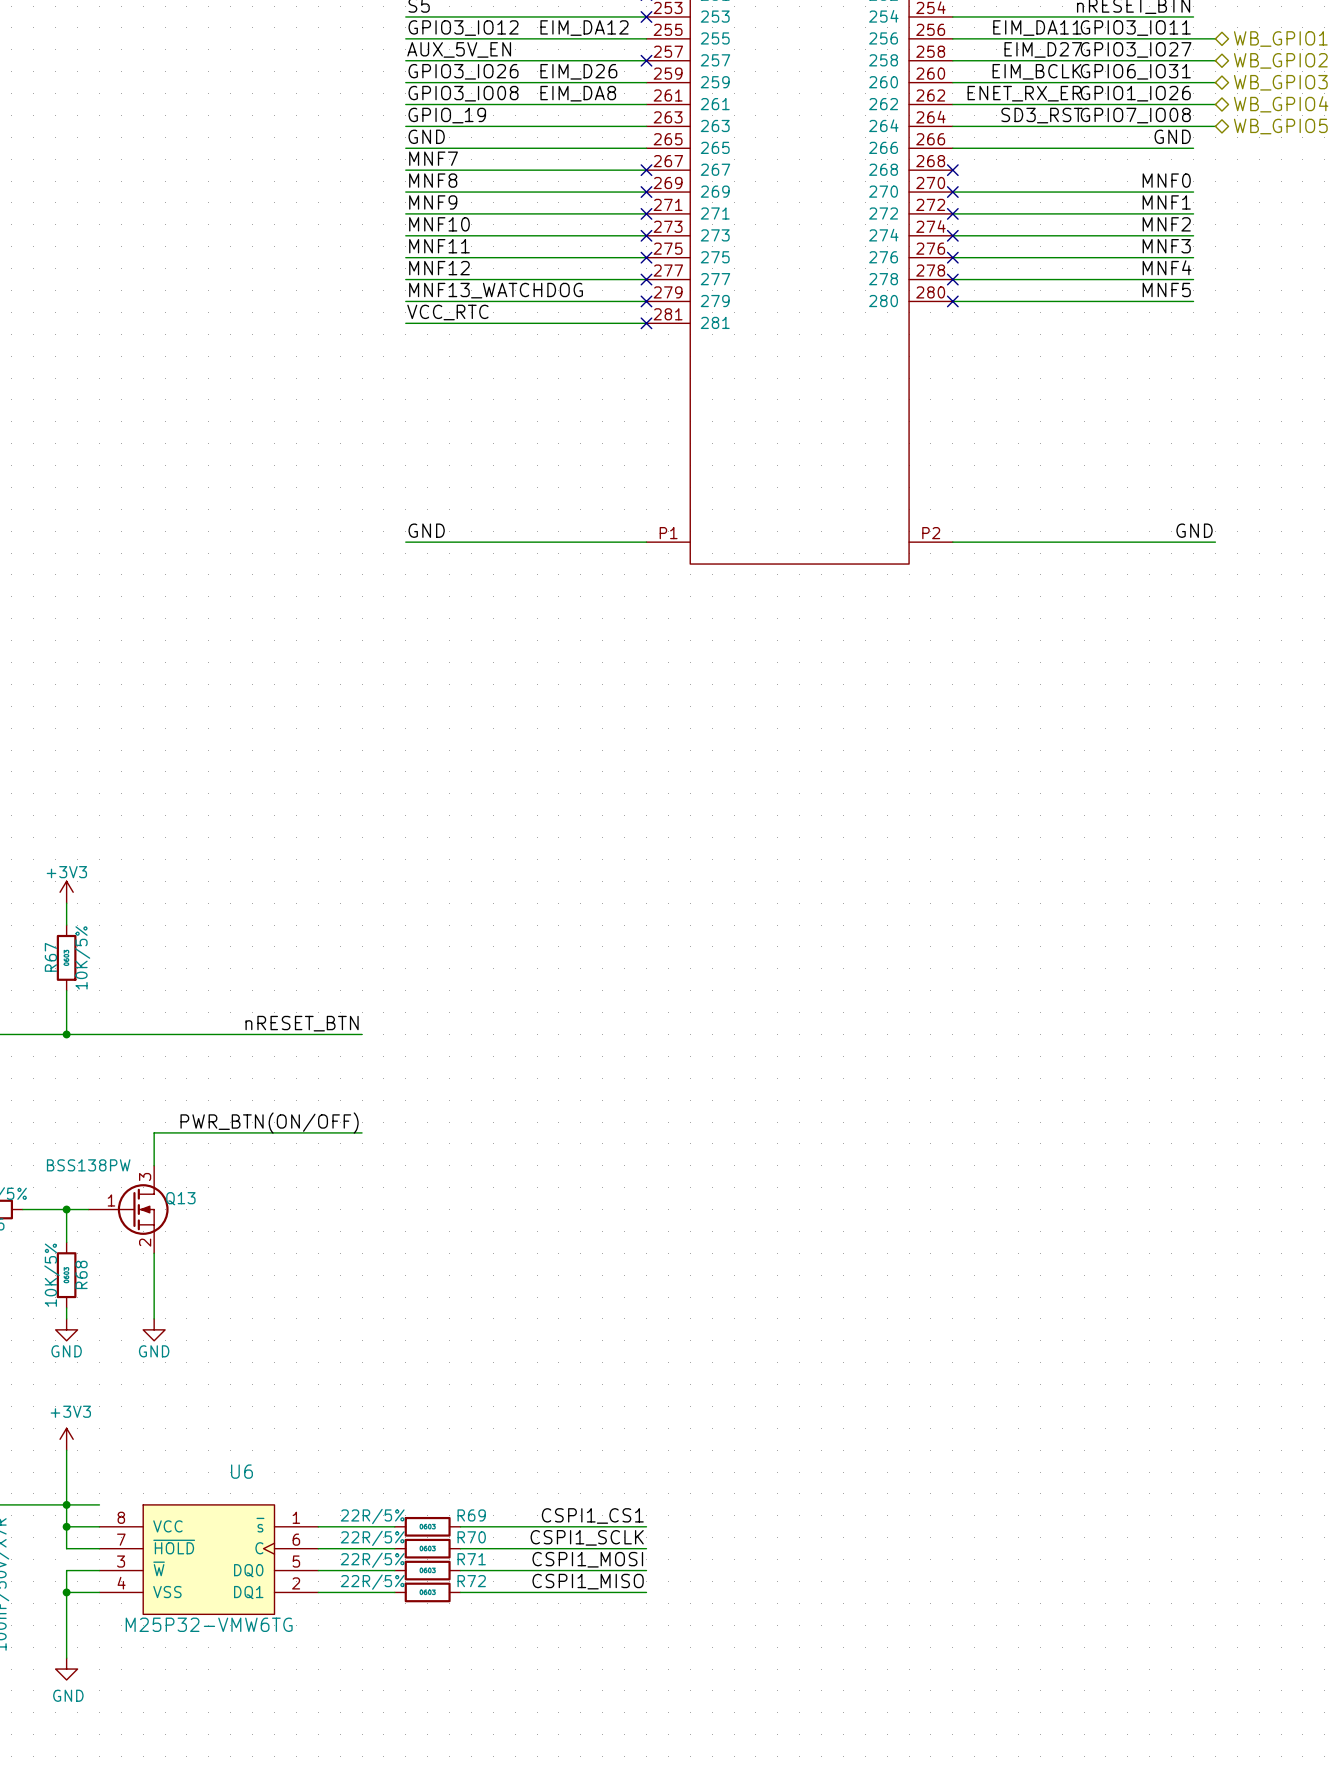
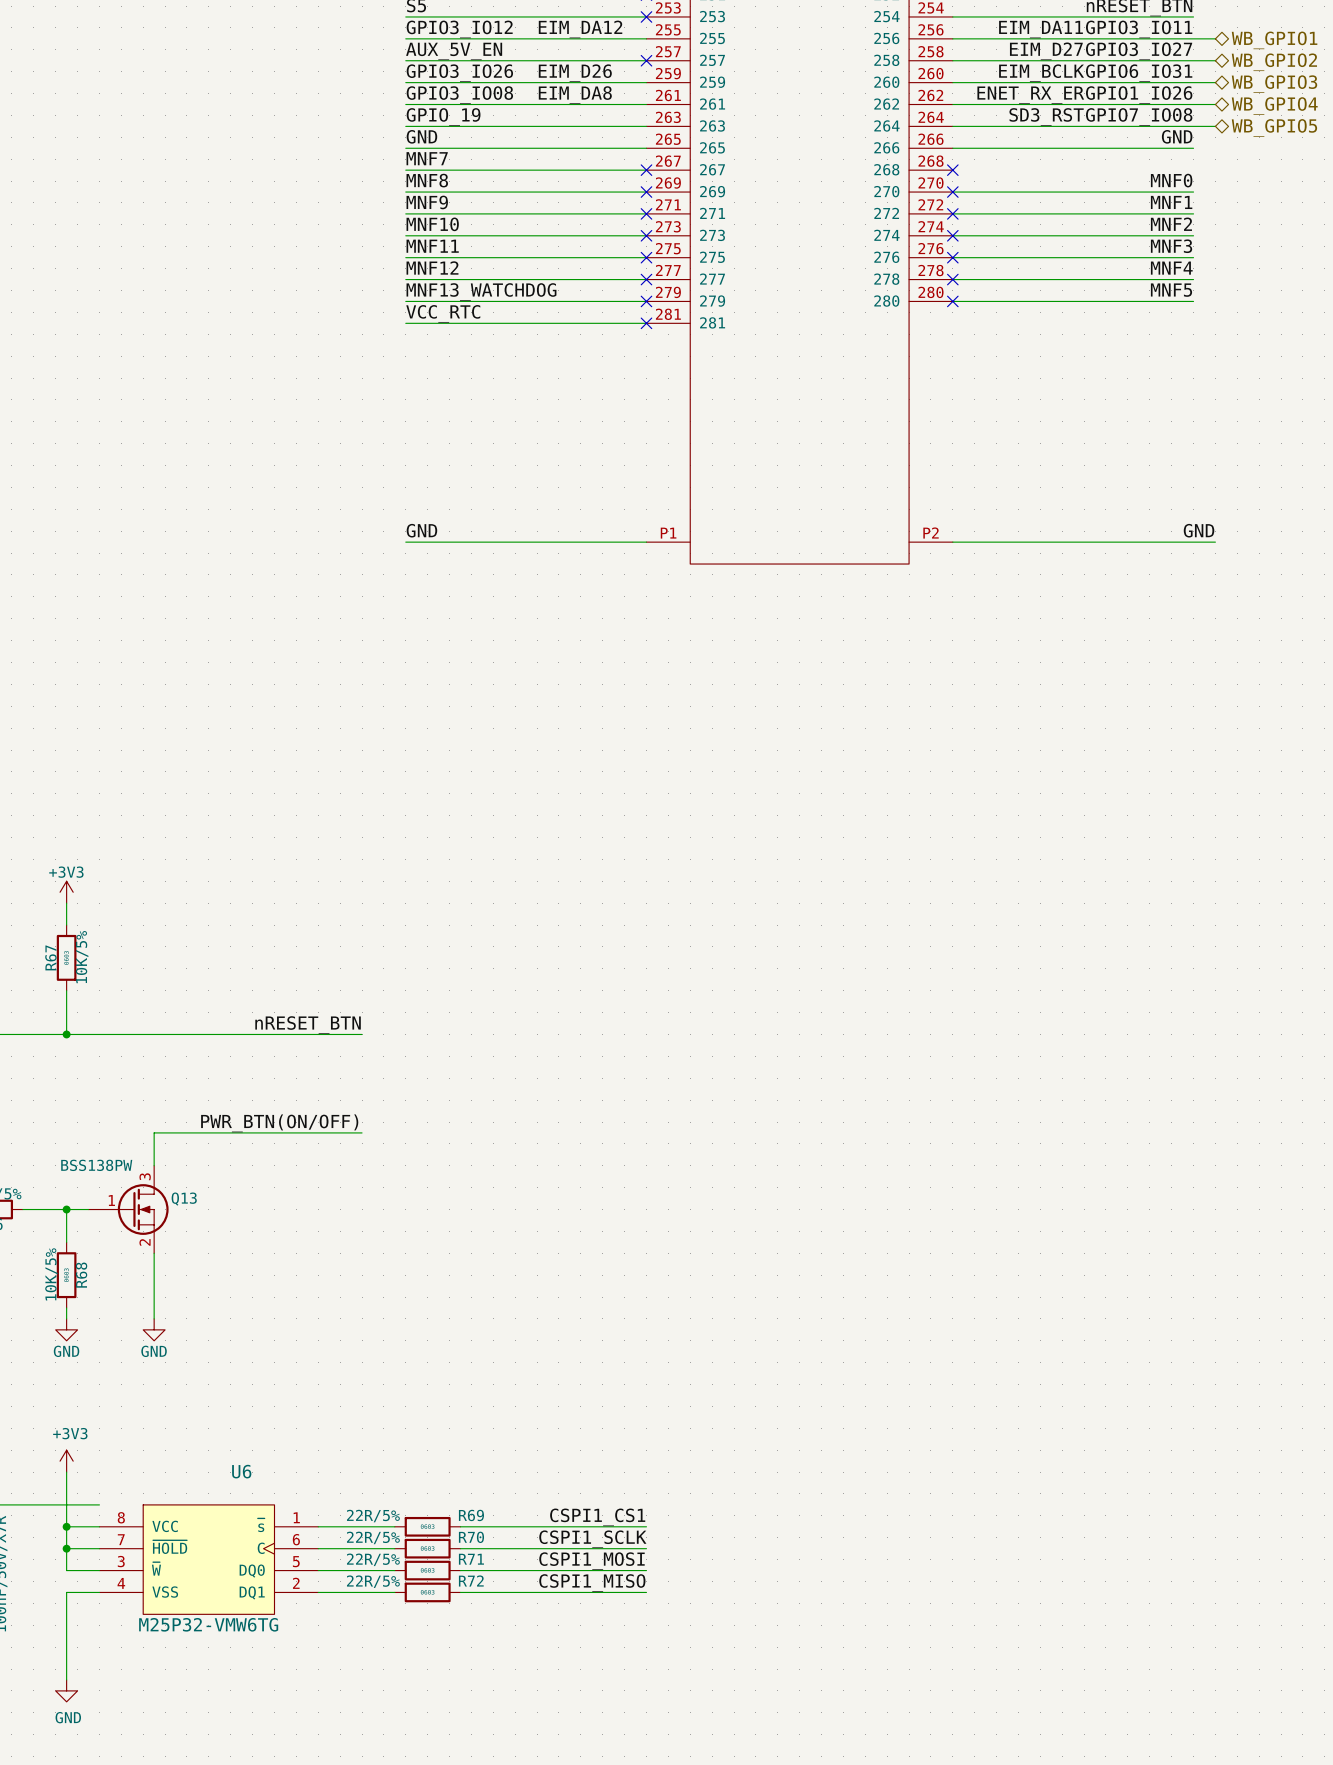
power symbol position: +3V3 (66, 1439) -> +3V3 (66, 1461)
junction: (66, 1504) -> none
junction: none -> (66, 1548)
wire: (66, 1570) (66, 1592) -> (66, 1570) (66, 1548)
junction: (66, 1592) -> none
power symbol position: GND (66, 1669) -> GND (66, 1690)

